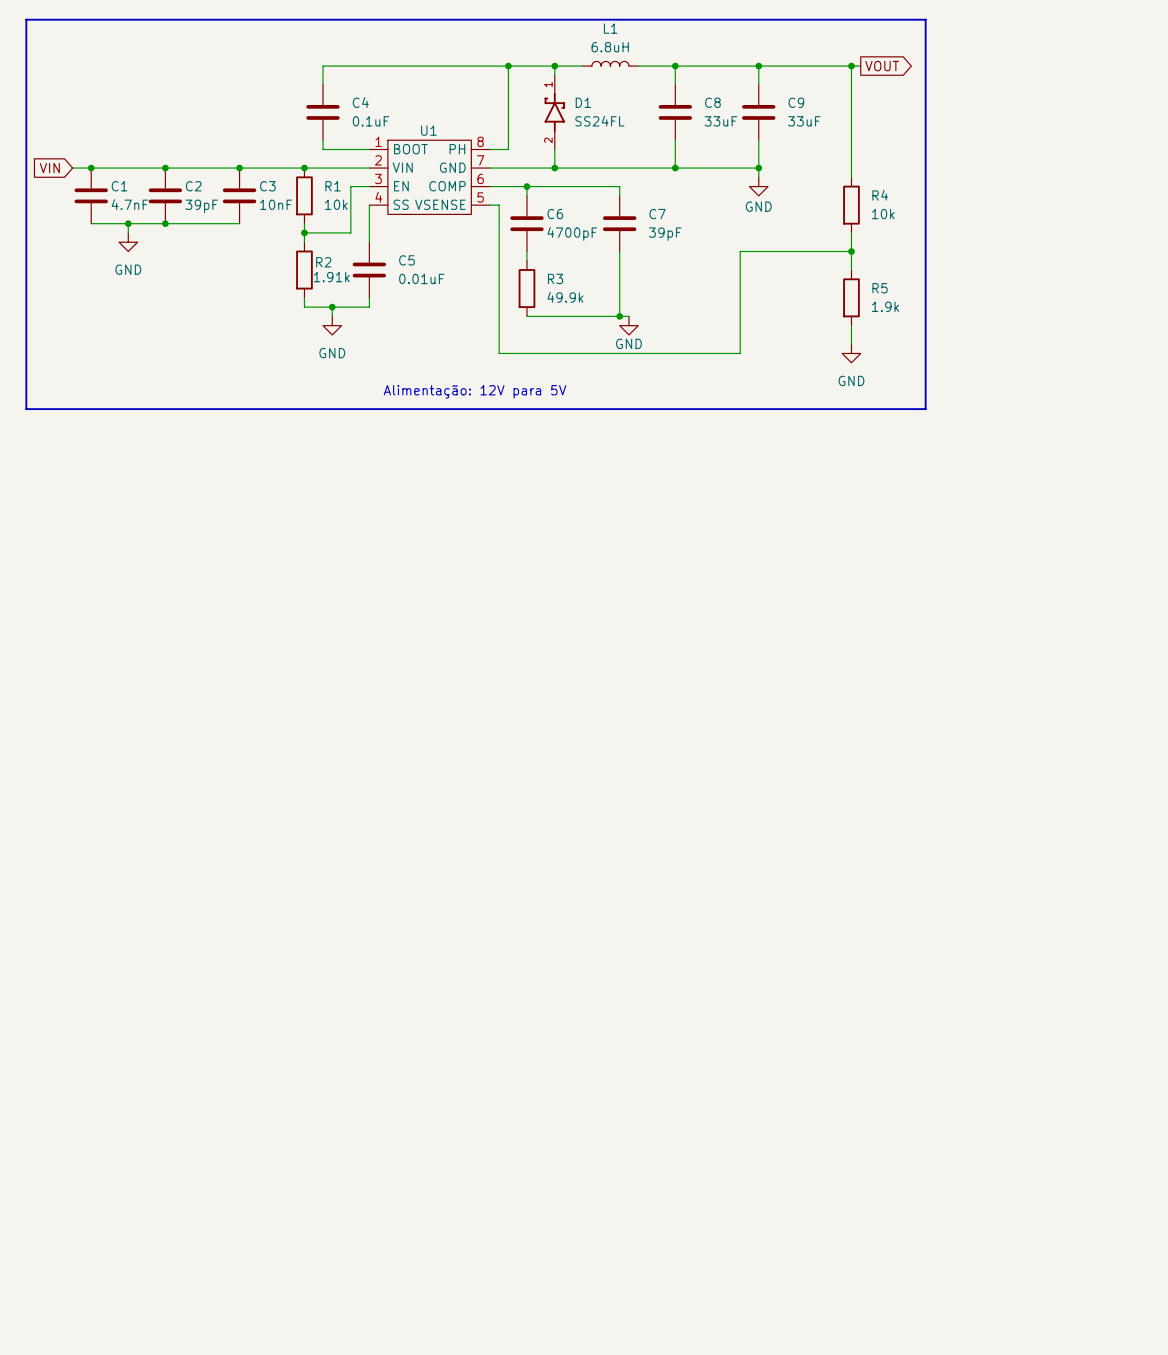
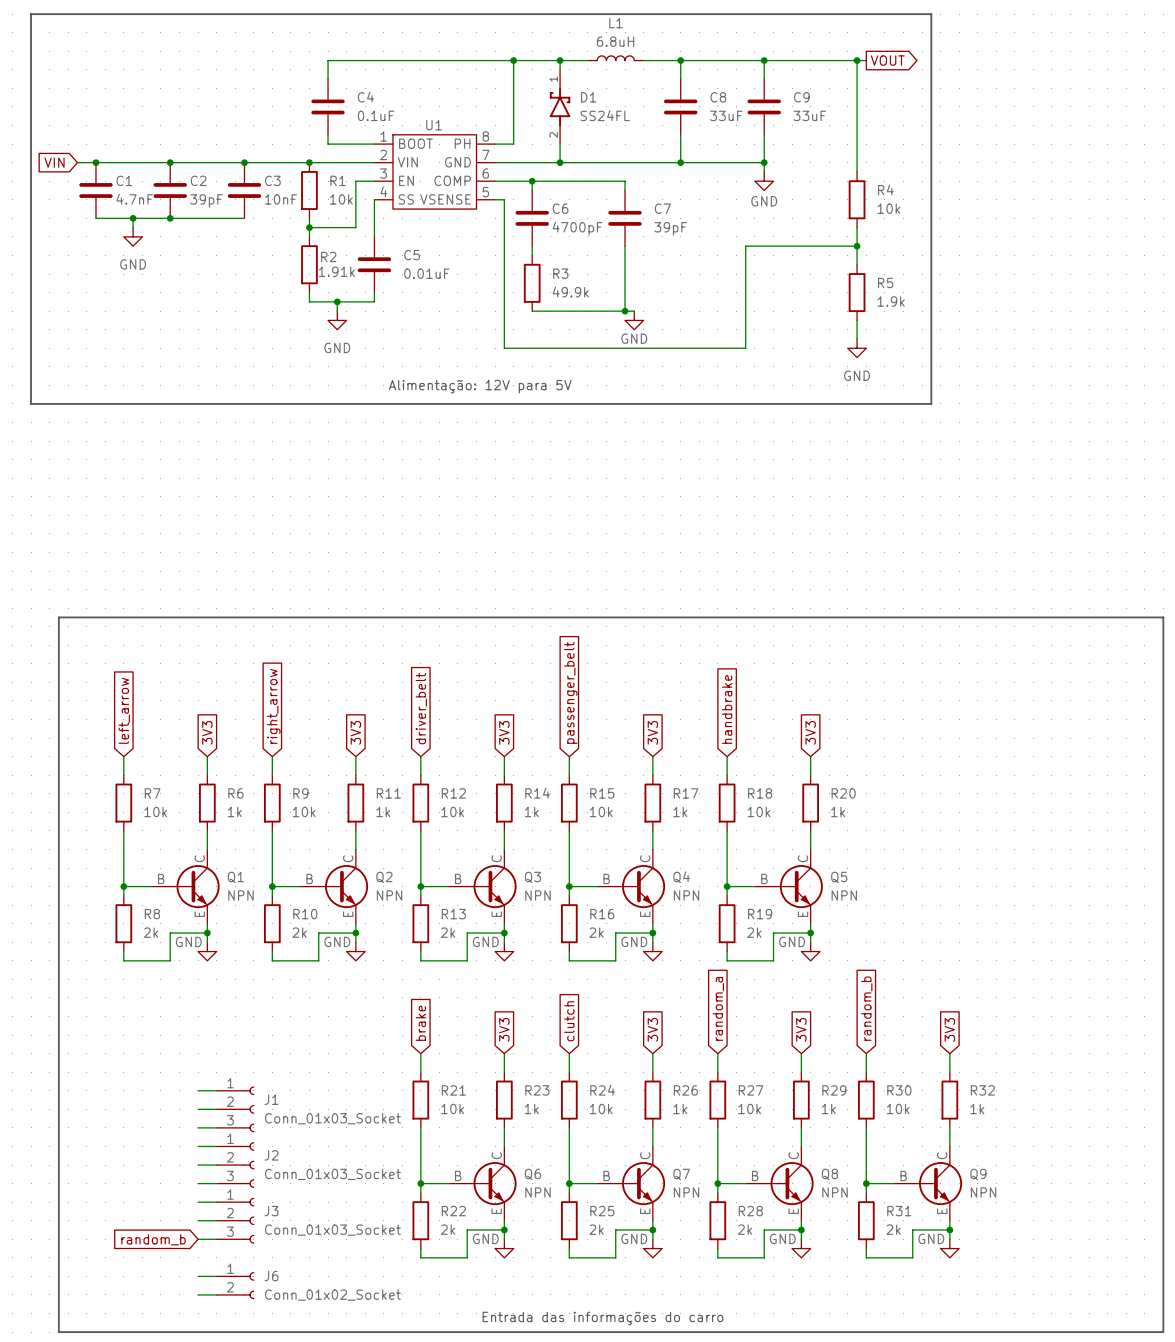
line: none -> (58, 617) (1163, 617) (1163, 1332) (58, 1332) (58, 617)
global label: none -> passenger_belt (570, 692)
global label: none -> right_arrow (273, 706)
global label: none -> driver_belt (421, 708)
global label: none -> handbrake (727, 709)
global label: none -> left_arrow (124, 710)
global label: none -> 3V3 (207, 732)
global label: none -> 3V3 (355, 732)
global label: none -> 3V3 (504, 732)
global label: none -> 3V3 (652, 732)
global label: none -> 3V3 (810, 732)
wire: none -> (123, 756) (123, 775)
wire: none -> (207, 756) (207, 775)
wire: none -> (272, 756) (272, 775)
wire: none -> (355, 756) (355, 775)
wire: none -> (420, 756) (420, 775)
wire: none -> (504, 756) (504, 775)
wire: none -> (569, 756) (569, 775)
wire: none -> (652, 756) (652, 775)
wire: none -> (727, 756) (727, 775)
wire: none -> (810, 756) (810, 775)
R7: none -> 10k (123, 803)
R6: none -> 1k (207, 803)
R9: none -> 10k (272, 803)
R11: none -> 1k (355, 803)
R12: none -> 10k (420, 803)
R14: none -> 1k (504, 803)
R15: none -> 10k (569, 803)
R17: none -> 1k (652, 803)
R18: none -> 10k (727, 803)
R20: none -> 1k (810, 803)
wire: none -> (123, 830) (123, 895)
wire: none -> (207, 830) (207, 849)
wire: none -> (272, 830) (272, 895)
wire: none -> (355, 830) (355, 849)
wire: none -> (420, 830) (420, 895)
wire: none -> (504, 830) (504, 849)
wire: none -> (569, 830) (569, 895)
wire: none -> (652, 830) (652, 849)
wire: none -> (727, 830) (727, 895)
wire: none -> (810, 830) (810, 849)
wire: none -> (123, 886) (151, 886)
junction: none -> (123, 886)
Q1: none -> NPN (185, 886)
wire: none -> (272, 886) (300, 886)
junction: none -> (272, 886)
Q2: none -> NPN (334, 886)
wire: none -> (420, 886) (448, 886)
junction: none -> (420, 886)
Q3: none -> NPN (482, 886)
wire: none -> (569, 886) (597, 886)
junction: none -> (569, 886)
Q4: none -> NPN (631, 886)
wire: none -> (727, 886) (754, 886)
junction: none -> (727, 886)
Q5: none -> NPN (788, 886)
R8: none -> 2k (123, 923)
wire: none -> (207, 923) (207, 942)
R10: none -> 2k (272, 923)
wire: none -> (355, 923) (355, 942)
R13: none -> 2k (420, 923)
wire: none -> (504, 923) (504, 942)
R16: none -> 2k (569, 923)
wire: none -> (652, 923) (652, 942)
R19: none -> 2k (727, 923)
wire: none -> (810, 923) (810, 942)
wire: none -> (207, 933) (170, 933) (170, 960) (123, 960) (123, 951)
junction: none -> (207, 933)
wire: none -> (355, 933) (318, 933) (318, 960) (272, 960) (272, 951)
junction: none -> (355, 933)
wire: none -> (504, 933) (467, 933) (467, 960) (420, 960) (420, 951)
junction: none -> (504, 933)
wire: none -> (652, 933) (615, 933) (615, 960) (569, 960) (569, 951)
junction: none -> (652, 933)
wire: none -> (810, 933) (773, 933) (773, 960) (727, 960) (727, 951)
junction: none -> (810, 933)
power symbol: none -> GND (207, 951)
power symbol: none -> GND (355, 951)
power symbol: none -> GND (504, 951)
power symbol: none -> GND (652, 951)
power symbol: none -> GND (810, 951)
global label: none -> random_a (718, 1008)
global label: none -> random_b (866, 1008)
global label: none -> clutch (569, 1021)
global label: none -> brake (420, 1023)
global label: none -> 3V3 (504, 1029)
global label: none -> 3V3 (652, 1029)
global label: none -> 3V3 (801, 1029)
global label: none -> 3V3 (949, 1029)
wire: none -> (420, 1053) (420, 1072)
wire: none -> (504, 1053) (504, 1072)
wire: none -> (569, 1053) (569, 1072)
wire: none -> (652, 1053) (652, 1072)
wire: none -> (717, 1053) (717, 1072)
wire: none -> (801, 1053) (801, 1072)
wire: none -> (866, 1053) (866, 1072)
wire: none -> (949, 1053) (949, 1072)
wire: none -> (198, 1090) (216, 1090)
R21: none -> 10k (420, 1100)
R23: none -> 1k (504, 1100)
R24: none -> 10k (569, 1100)
R26: none -> 1k (652, 1100)
R27: none -> 10k (717, 1100)
R29: none -> 1k (801, 1100)
R30: none -> 10k (866, 1100)
R32: none -> 1k (949, 1100)
wire: none -> (198, 1109) (216, 1109)
J1: none -> Conn_01x03_Socket (235, 1109)
wire: none -> (198, 1127) (216, 1127)
wire: none -> (420, 1127) (420, 1192)
wire: none -> (504, 1127) (504, 1146)
wire: none -> (569, 1127) (569, 1192)
wire: none -> (652, 1127) (652, 1146)
wire: none -> (717, 1127) (717, 1192)
wire: none -> (801, 1127) (801, 1146)
wire: none -> (866, 1127) (866, 1192)
wire: none -> (949, 1127) (949, 1146)
wire: none -> (198, 1146) (216, 1146)
wire: none -> (198, 1165) (216, 1165)
J2: none -> Conn_01x03_Socket (235, 1165)
wire: none -> (198, 1183) (216, 1183)
wire: none -> (420, 1183) (448, 1183)
junction: none -> (420, 1183)
Q6: none -> NPN (482, 1183)
wire: none -> (569, 1183) (597, 1183)
junction: none -> (569, 1183)
Q7: none -> NPN (631, 1183)
wire: none -> (717, 1183) (745, 1183)
junction: none -> (717, 1183)
Q8: none -> NPN (779, 1183)
wire: none -> (866, 1183) (894, 1183)
junction: none -> (866, 1183)
Q9: none -> NPN (928, 1183)
wire: none -> (198, 1202) (216, 1202)
wire: none -> (198, 1220) (216, 1220)
J3: none -> Conn_01x03_Socket (235, 1220)
R22: none -> 2k (420, 1220)
wire: none -> (504, 1220) (504, 1239)
R25: none -> 2k (569, 1220)
wire: none -> (652, 1220) (652, 1239)
R28: none -> 2k (717, 1220)
wire: none -> (801, 1220) (801, 1239)
R31: none -> 2k (866, 1220)
wire: none -> (949, 1220) (949, 1239)
wire: none -> (504, 1230) (467, 1230) (467, 1257) (420, 1257) (420, 1248)
junction: none -> (504, 1230)
wire: none -> (652, 1230) (615, 1230) (615, 1257) (569, 1257) (569, 1248)
junction: none -> (652, 1230)
wire: none -> (801, 1230) (764, 1230) (764, 1257) (717, 1257) (717, 1248)
junction: none -> (801, 1230)
wire: none -> (949, 1230) (912, 1230) (912, 1257) (866, 1257) (866, 1248)
junction: none -> (949, 1230)
global label: none -> random_b (153, 1239)
wire: none -> (198, 1239) (216, 1239)
power symbol: none -> GND (504, 1248)
power symbol: none -> GND (652, 1248)
power symbol: none -> GND (801, 1248)
power symbol: none -> GND (949, 1248)
wire: none -> (198, 1276) (216, 1276)
J6: none -> Conn_01x02_Socket (235, 1285)
wire: none -> (198, 1294) (216, 1294)
text: none -> Entrada das informações do carro (602, 1318)

